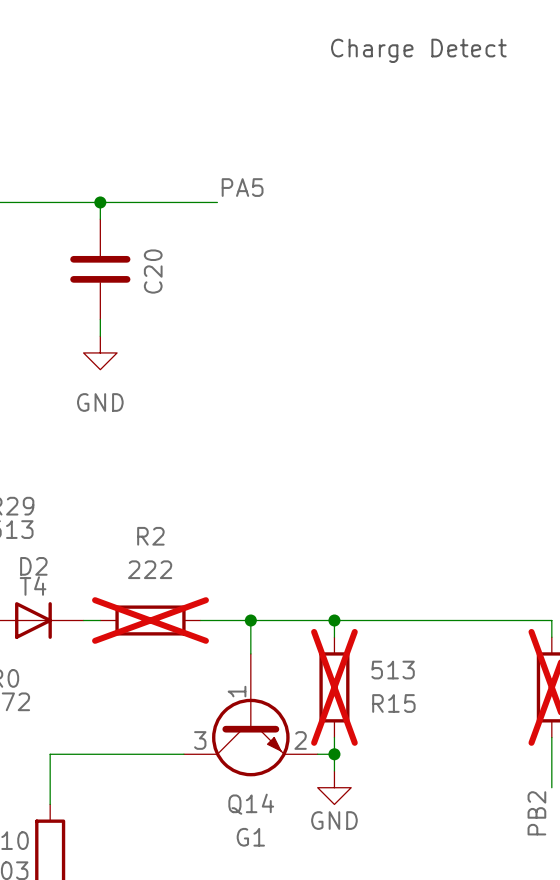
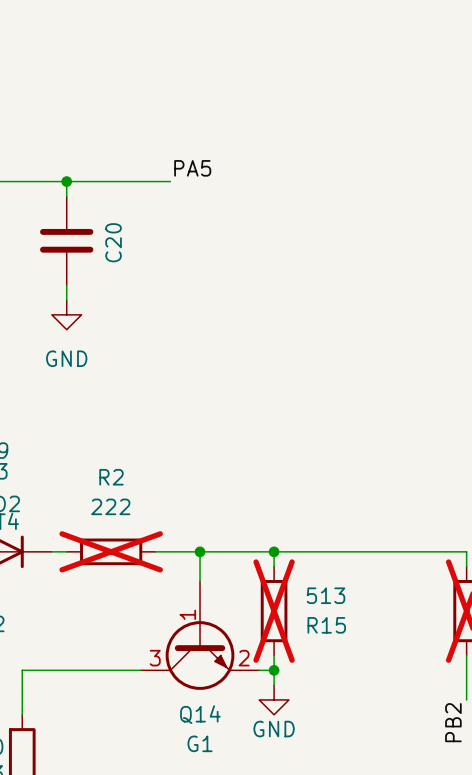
text: Charge Detect (418, 50) -> none

